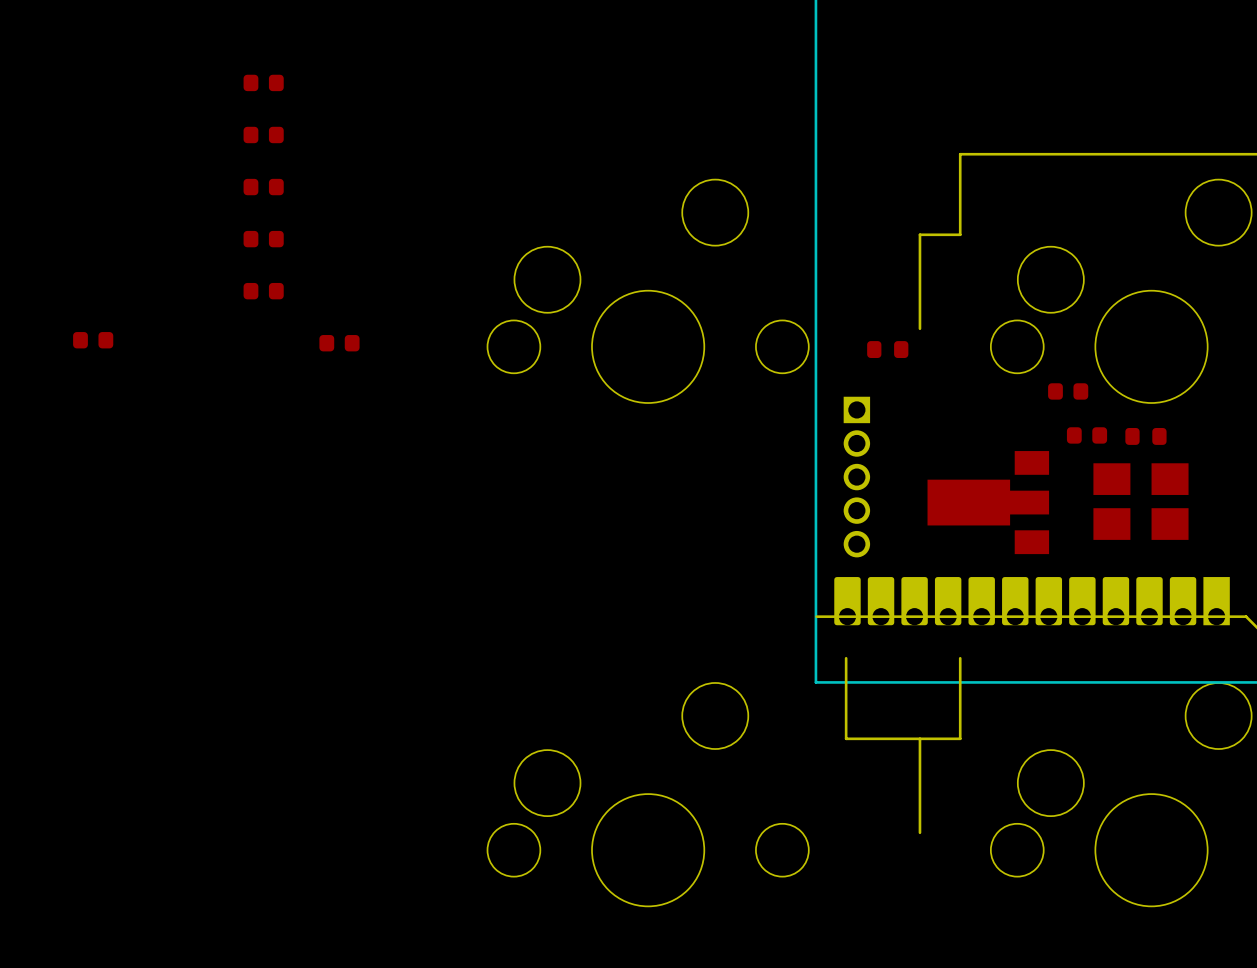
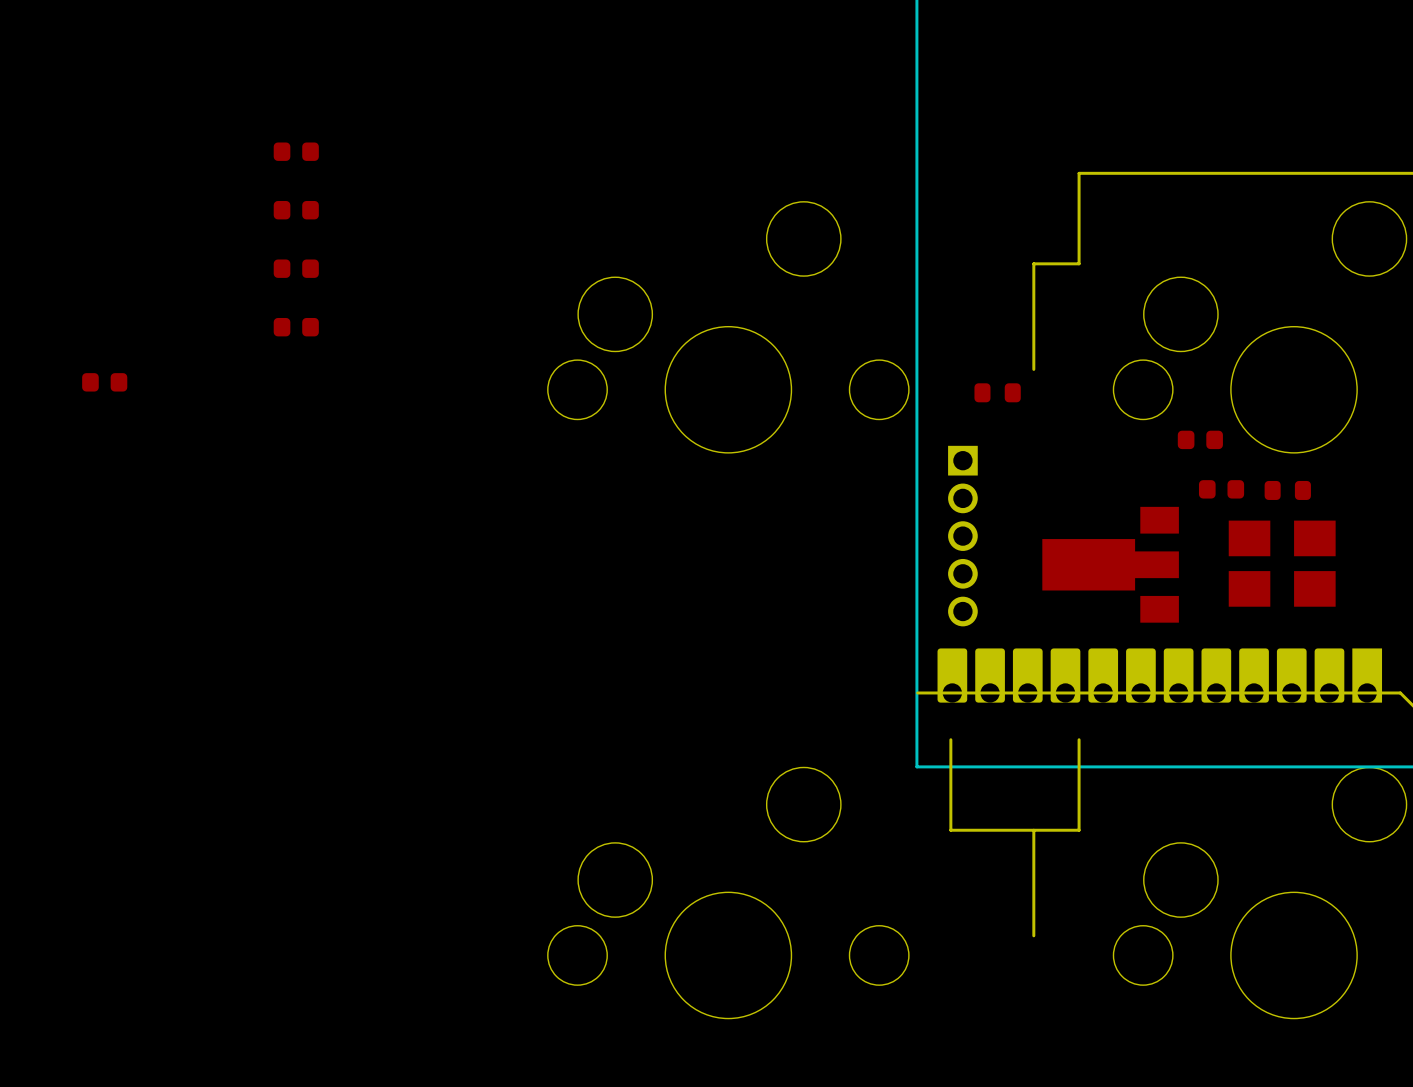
part: (263, 82) -> none
part: (339, 343) -> none

